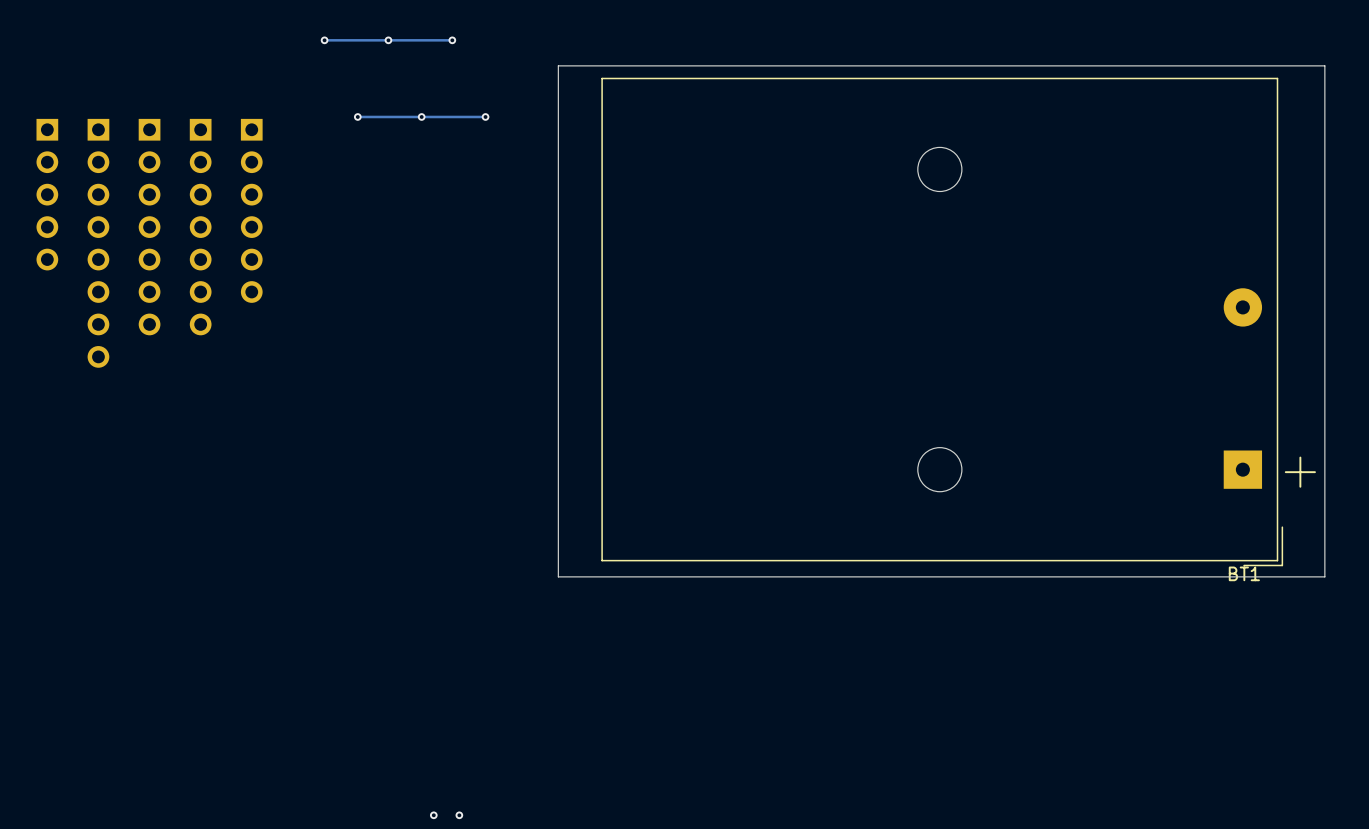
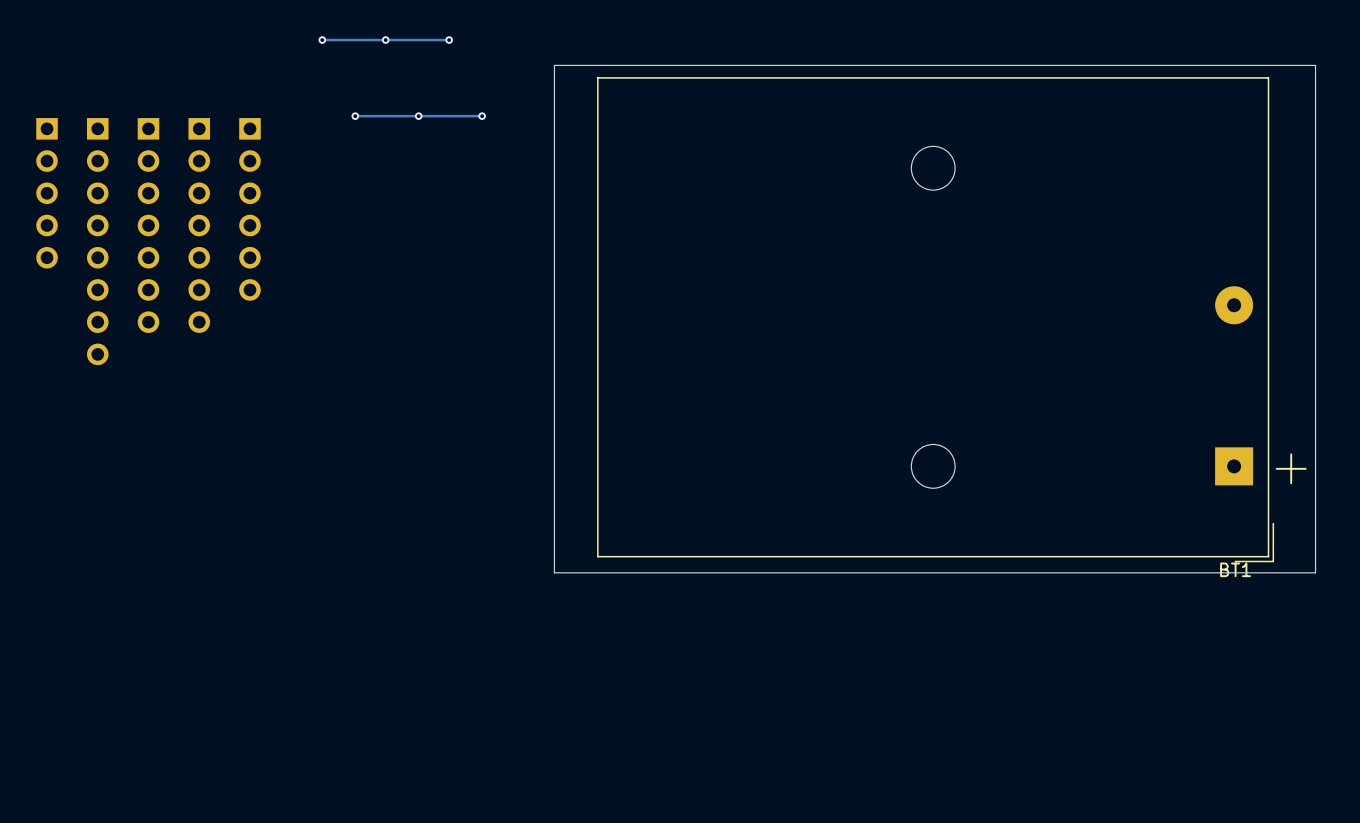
via: (433, 815) -> none
via: (459, 815) -> none

